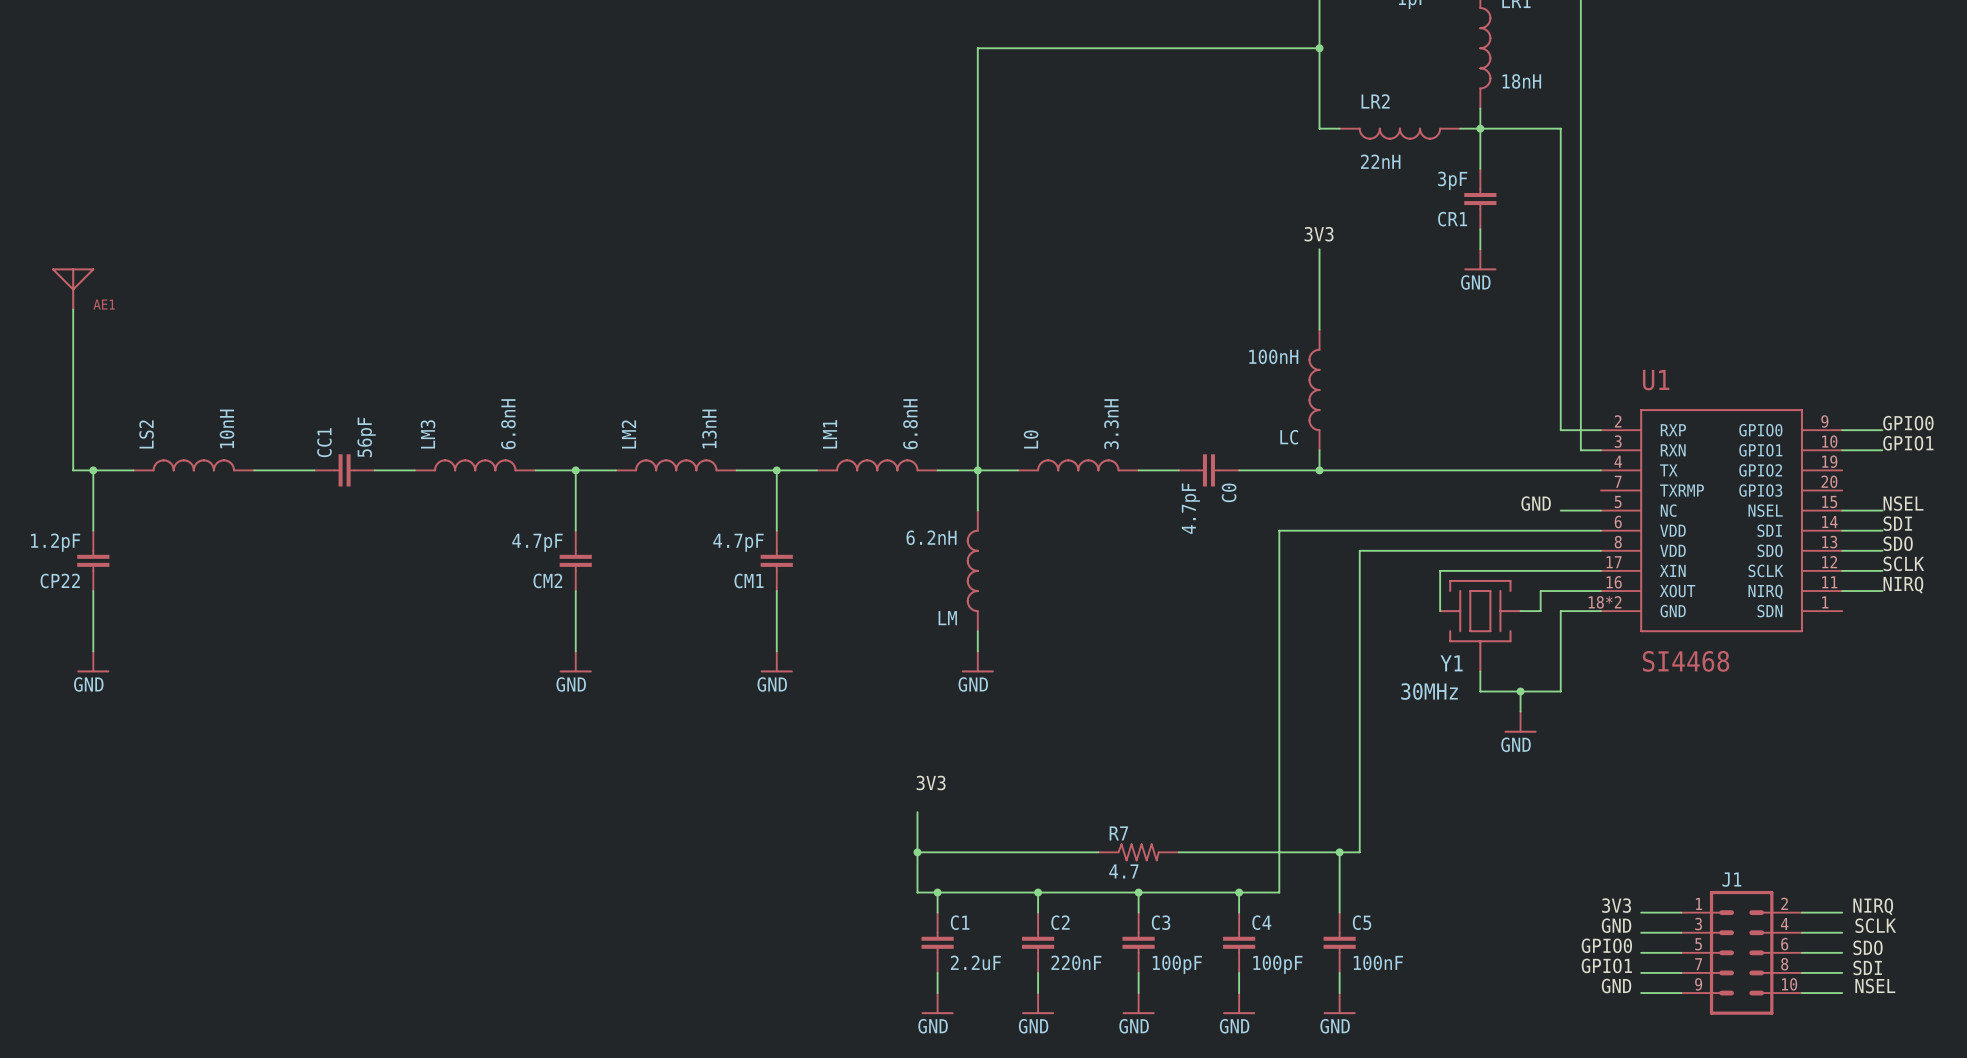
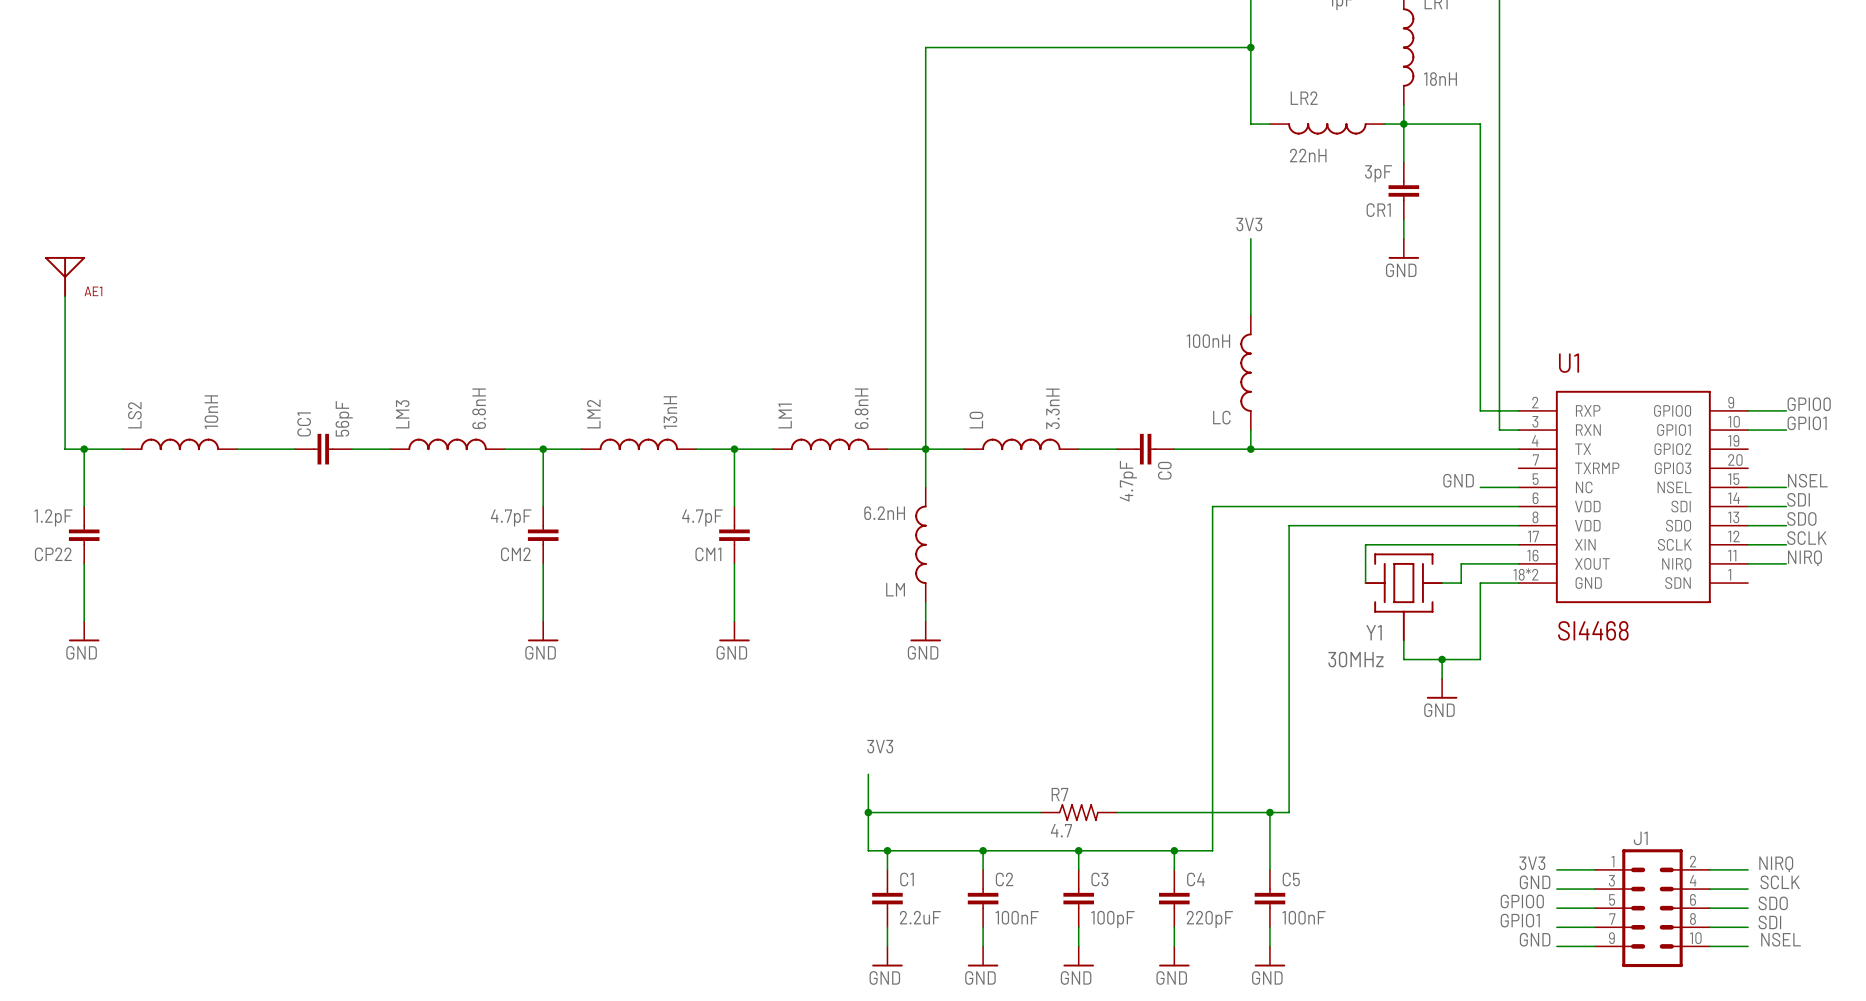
C2 value: 220nF (1076, 962) -> 100nF (1017, 917)
C4 value: 100pF (1277, 964) -> 220pF (1209, 919)

